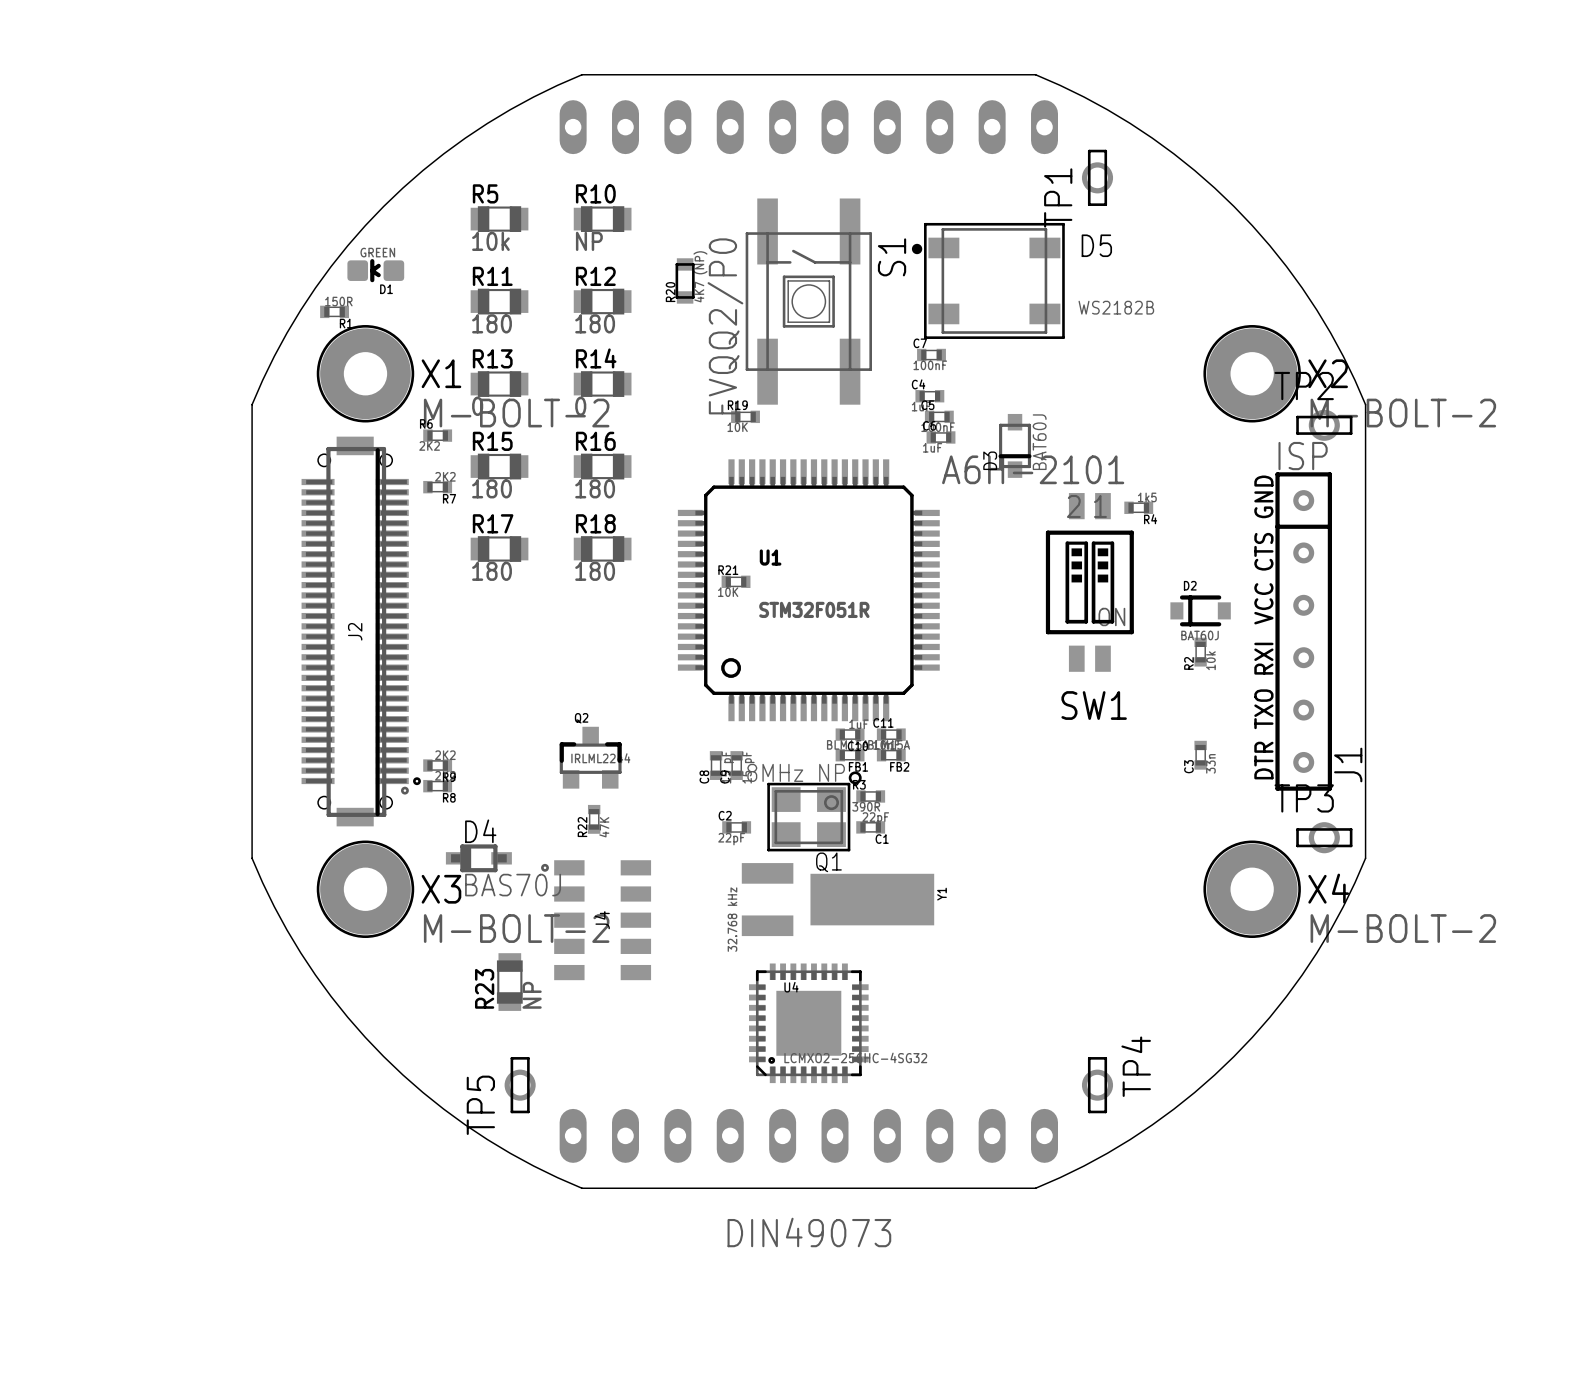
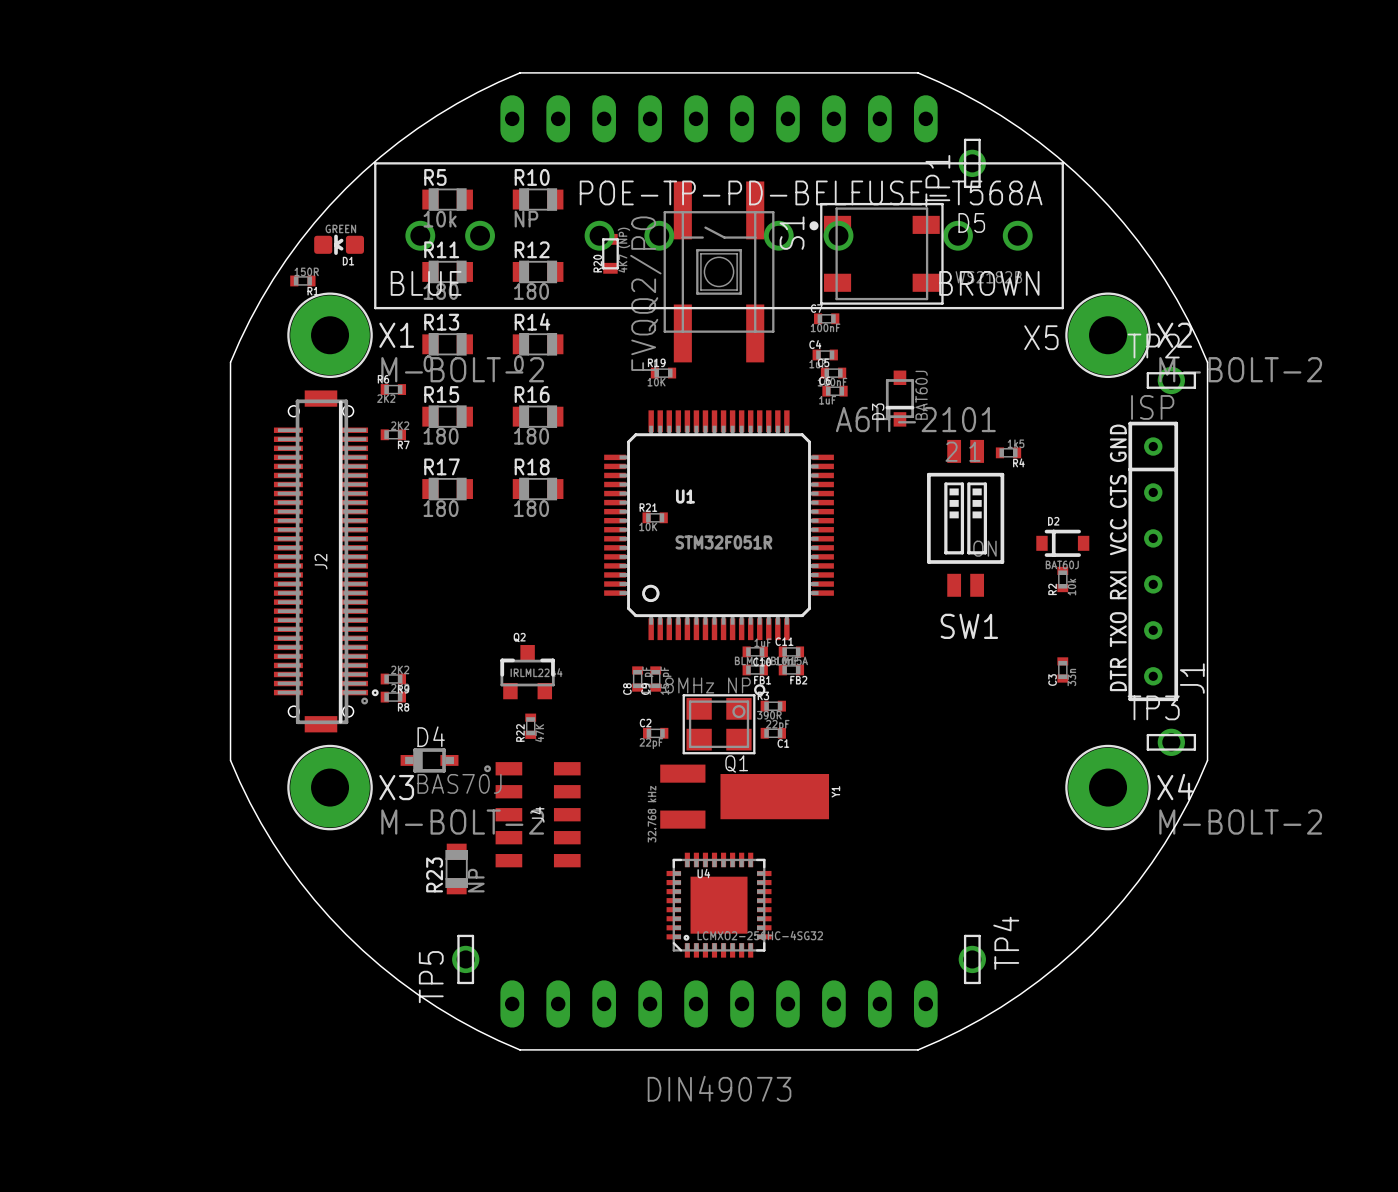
X5: none -> POE-TP-PD-BELFUSE-T568A (719, 235)

